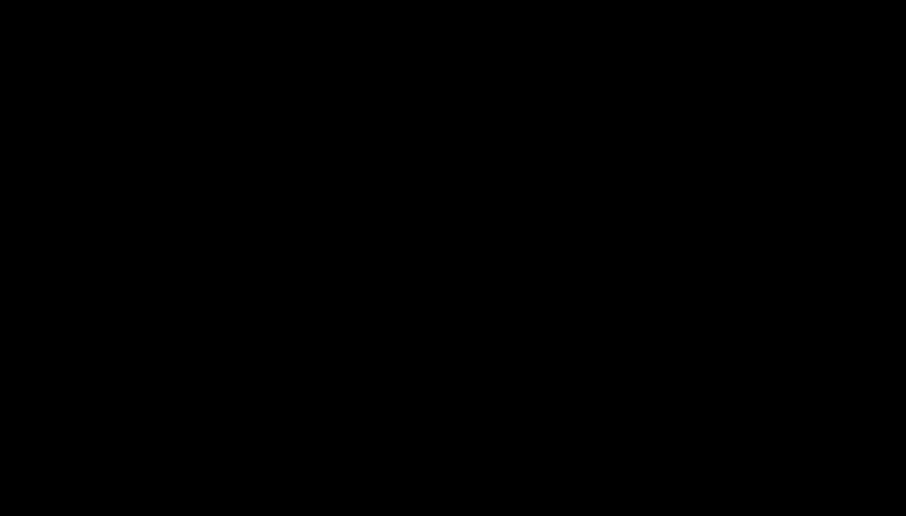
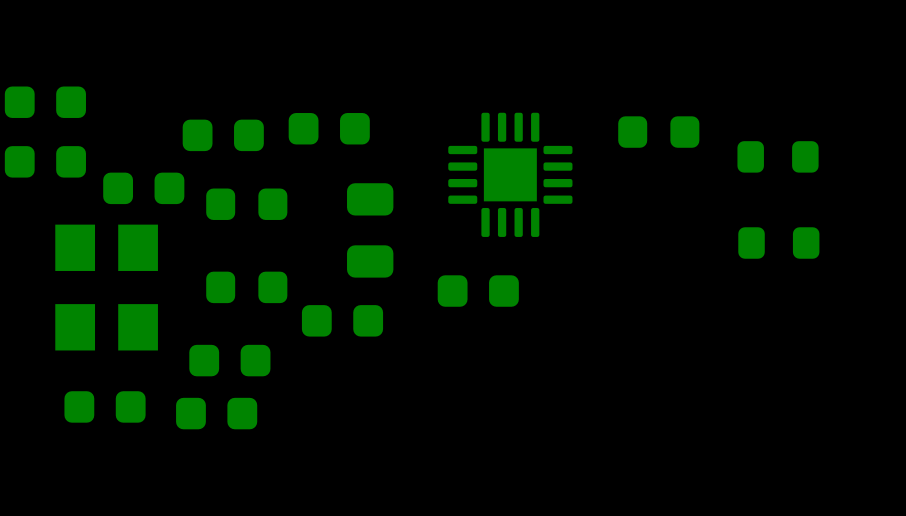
part: none -> (45, 102)
part: none -> (329, 128)
part: none -> (658, 132)
part: none -> (223, 135)
part: none -> (778, 156)
part: none -> (45, 161)
part: none -> (510, 174)
part: none -> (143, 188)
part: none -> (246, 204)
part: none -> (370, 230)
part: none -> (778, 243)
part: none -> (106, 287)
part: none -> (246, 287)
part: none -> (478, 291)
part: none -> (342, 320)
part: none -> (229, 360)
part: none -> (105, 406)
part: none -> (216, 413)

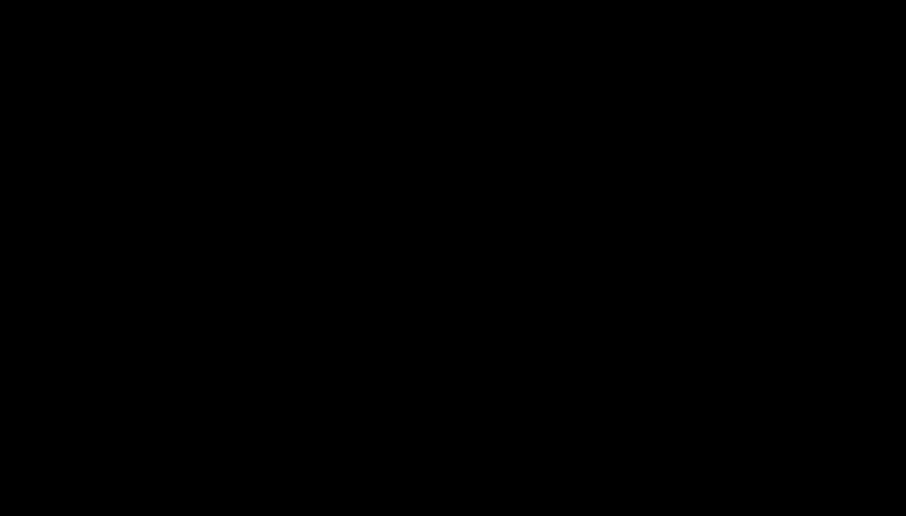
part: (45, 102) -> none
part: (329, 128) -> none
part: (658, 132) -> none
part: (223, 135) -> none
part: (778, 156) -> none
part: (45, 161) -> none
part: (510, 174) -> none
part: (143, 188) -> none
part: (246, 204) -> none
part: (370, 230) -> none
part: (778, 243) -> none
part: (106, 287) -> none
part: (246, 287) -> none
part: (478, 291) -> none
part: (342, 320) -> none
part: (229, 360) -> none
part: (105, 406) -> none
part: (216, 413) -> none

